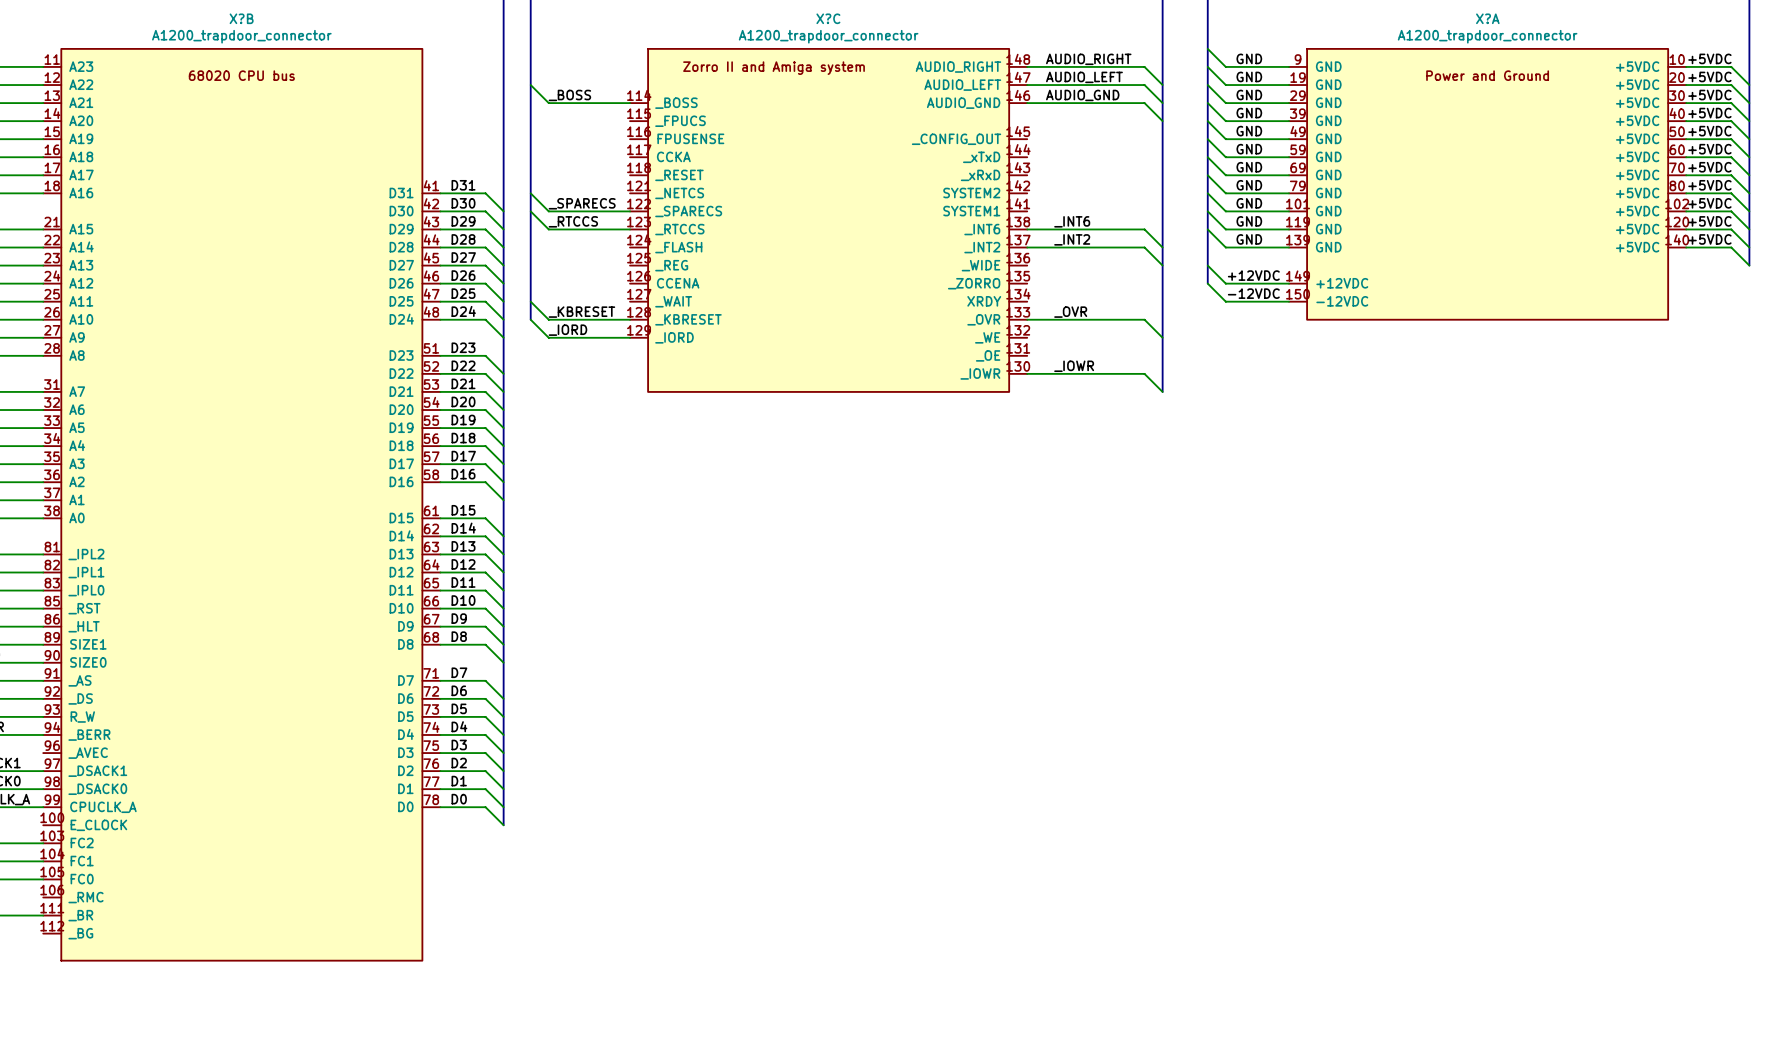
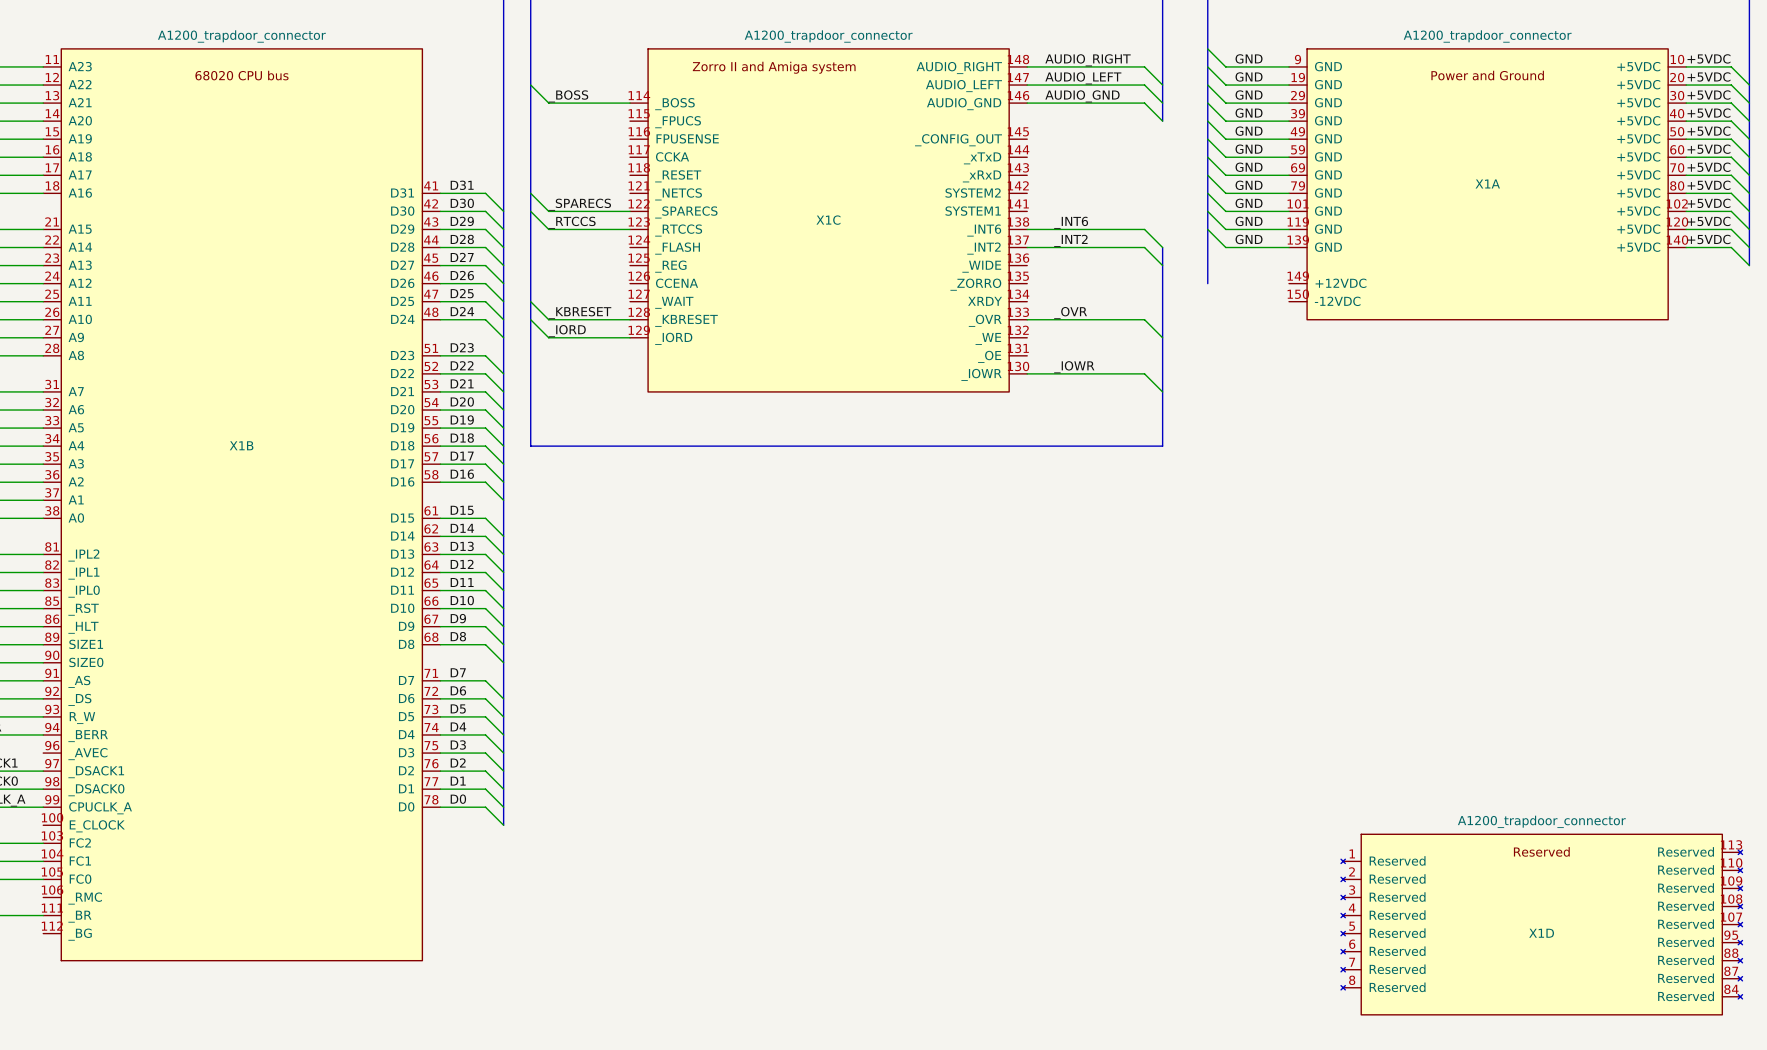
X?B name: X?B (241, 18) -> X1B (241, 445)
X?C name: X?C (828, 18) -> X1C (828, 220)
X?A name: X?A (1487, 18) -> X1A (1487, 183)
bus: (1162, 121) (1162, 247) -> none
wire: (1207, 265) (1225, 283) (1289, 283) -> none
label: +12VDC (1253, 275) -> none
wire: (1207, 283) (1225, 301) (1289, 301) -> none
label: -12VDC (1253, 293) -> none
bus: none -> (530, 319) (530, 446) (1162, 446) (1162, 391)
X1D: none -> A1200_trapdoor_connector (1541, 924)

